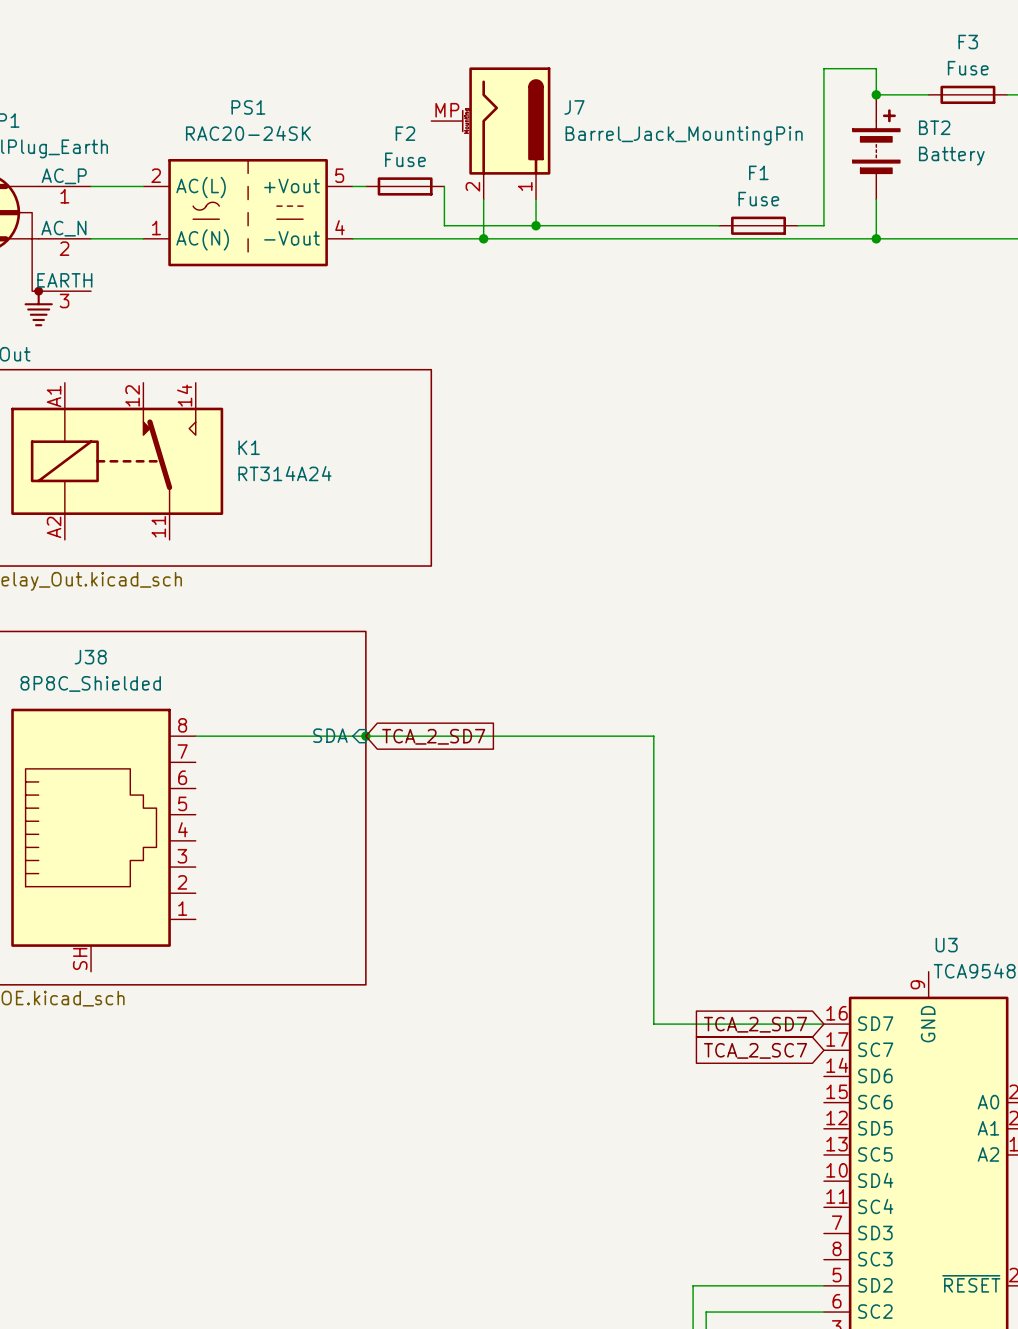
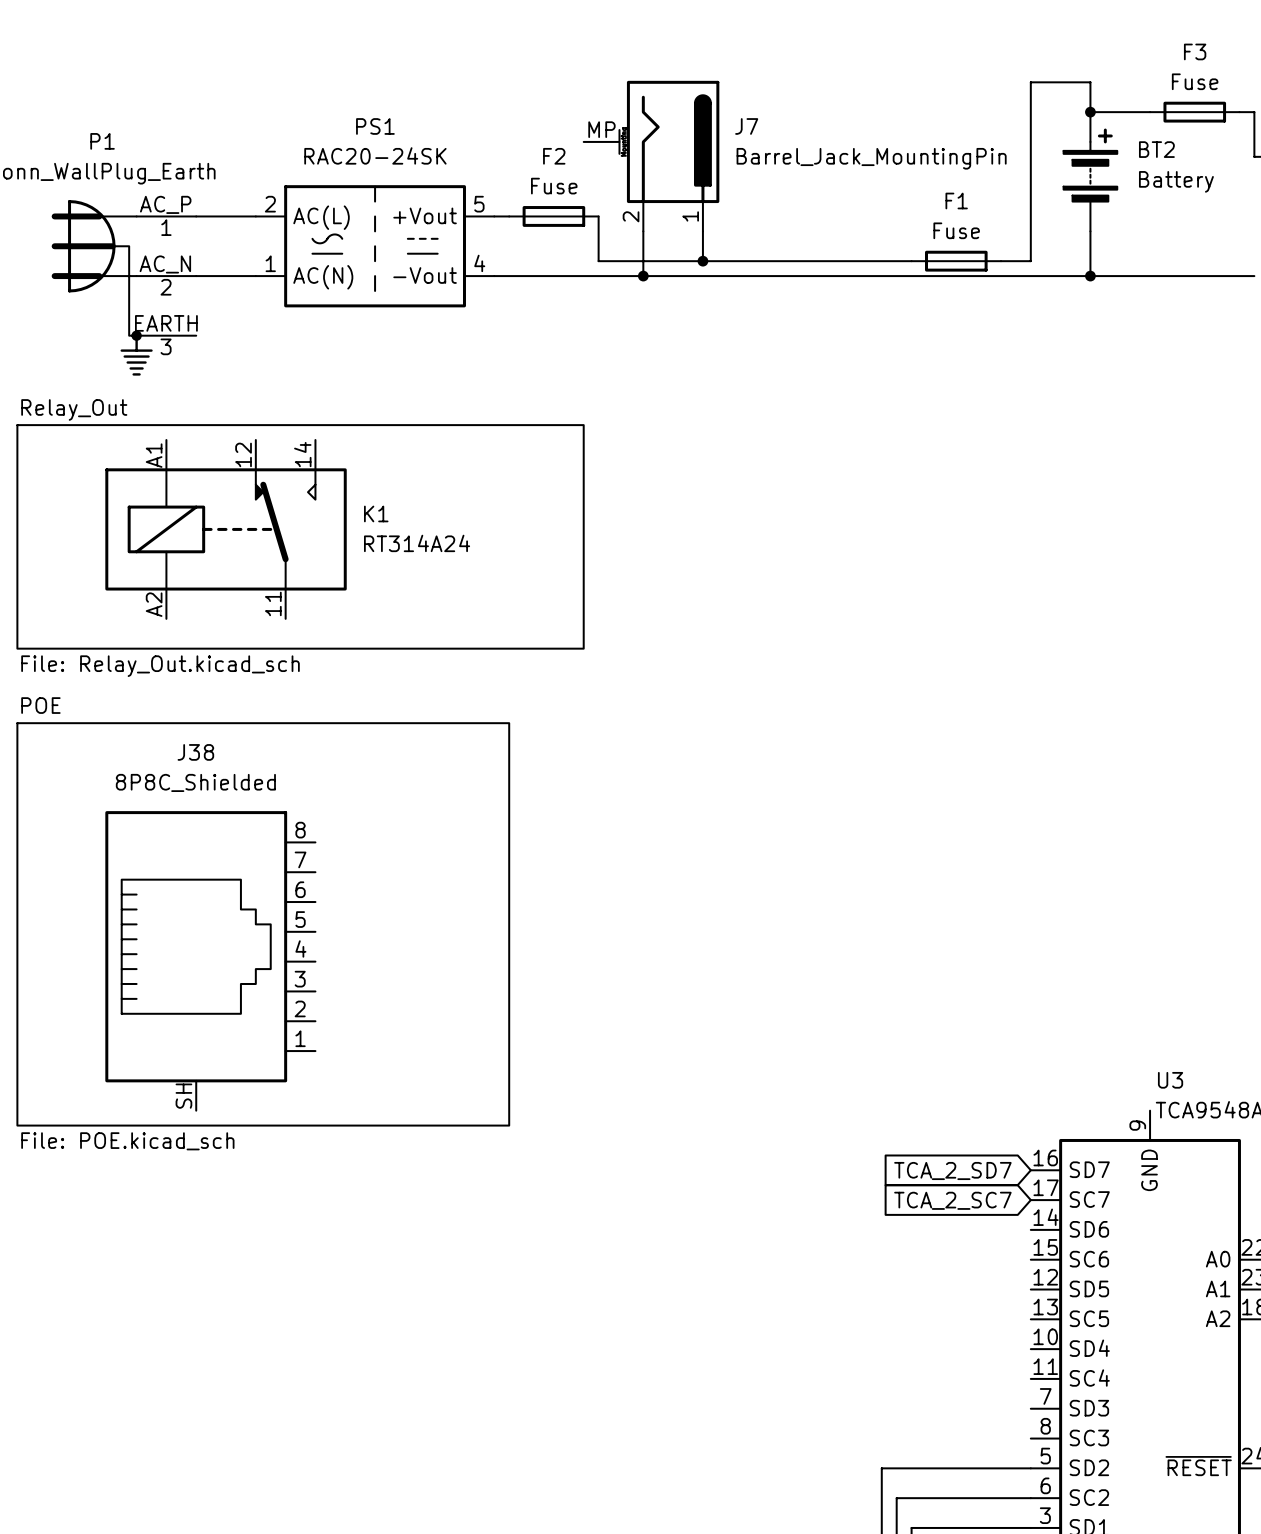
sheet pin: SDA (330, 735) -> none
wire: (195, 736) (653, 736) (653, 1024) (823, 1024) -> none
junction: (365, 736) -> none
global label: TCA_2_SD7 (433, 736) -> none

